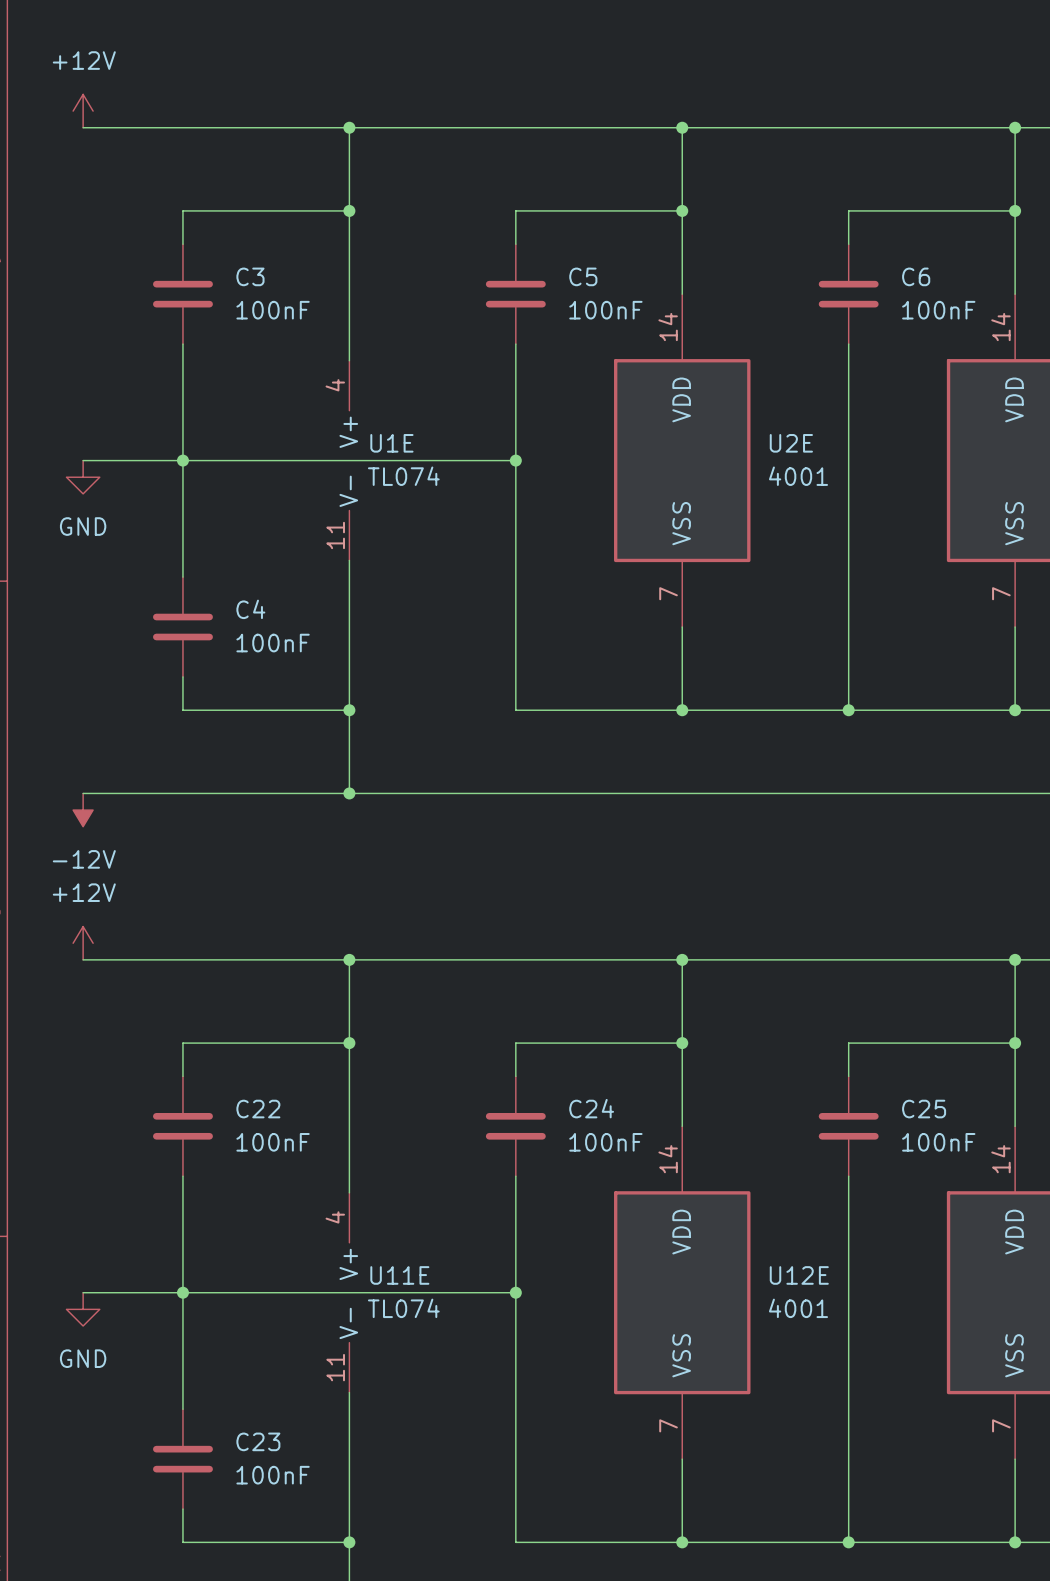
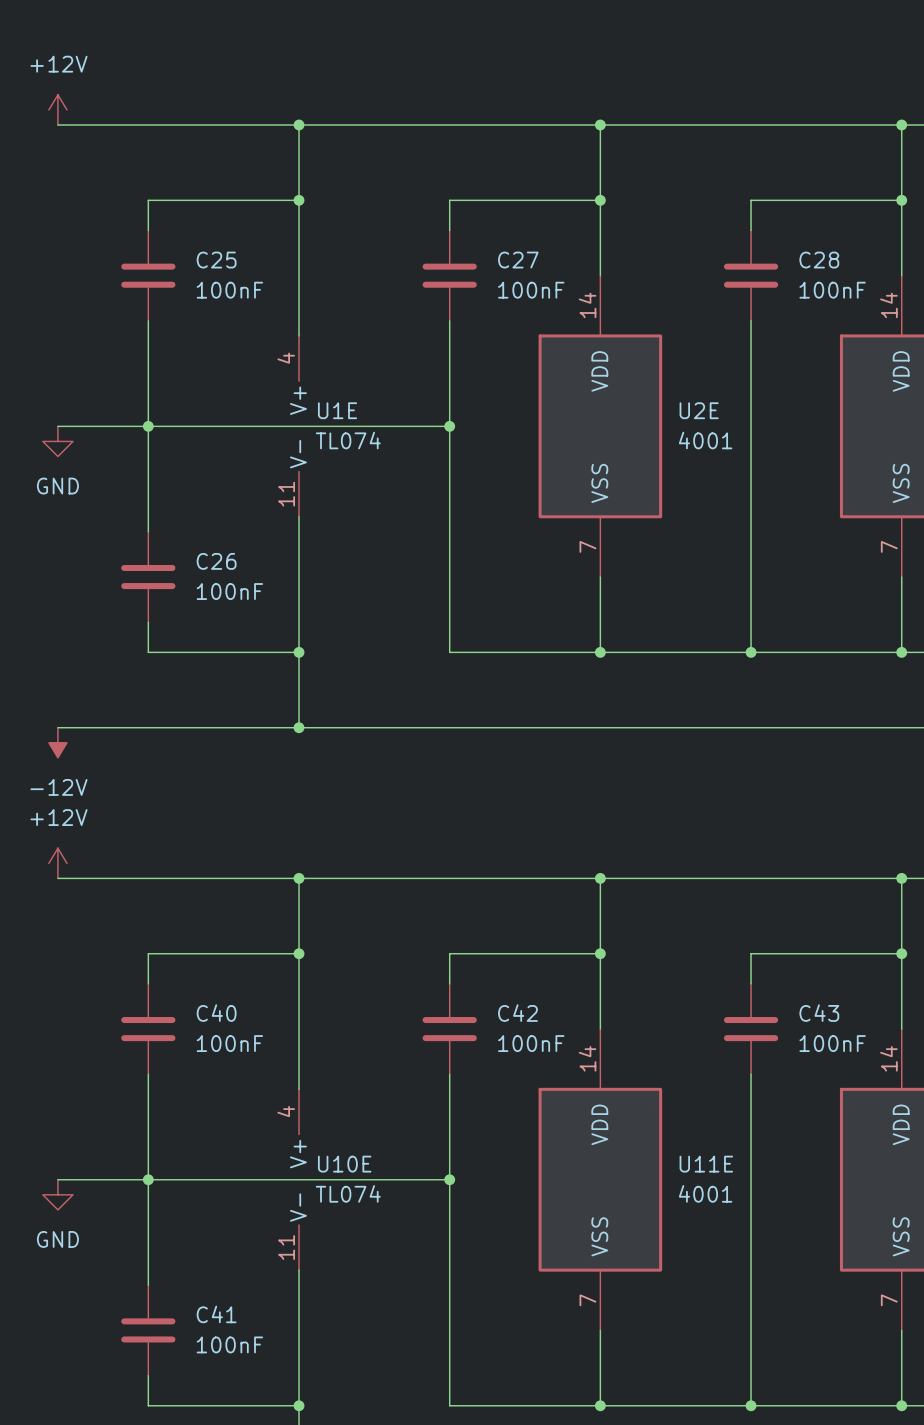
C3 name: C3 (250, 276) -> C25 (216, 260)
C5 name: C5 (583, 276) -> C27 (518, 260)
C6 name: C6 (916, 276) -> C28 (819, 260)
C4 name: C4 (250, 609) -> C26 (216, 561)
C24 name: C24 (591, 1108) -> C42 (517, 1013)
C22 name: C22 (258, 1109) -> C40 (216, 1013)
C25 name: C25 (924, 1109) -> C43 (819, 1013)
U11E name: U11E (399, 1275) -> U10E (344, 1164)
U12E name: U12E (799, 1275) -> U11E (706, 1164)
C23 name: C23 (258, 1441) -> C41 (216, 1314)

